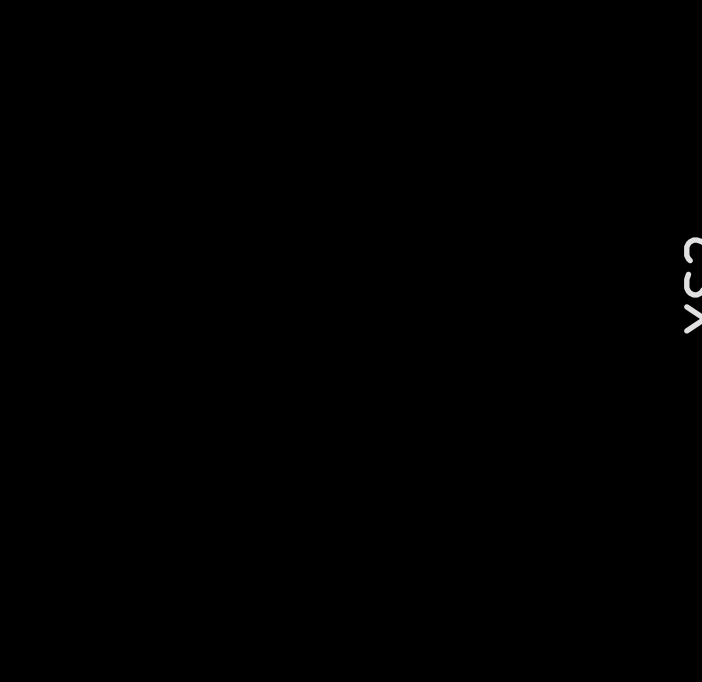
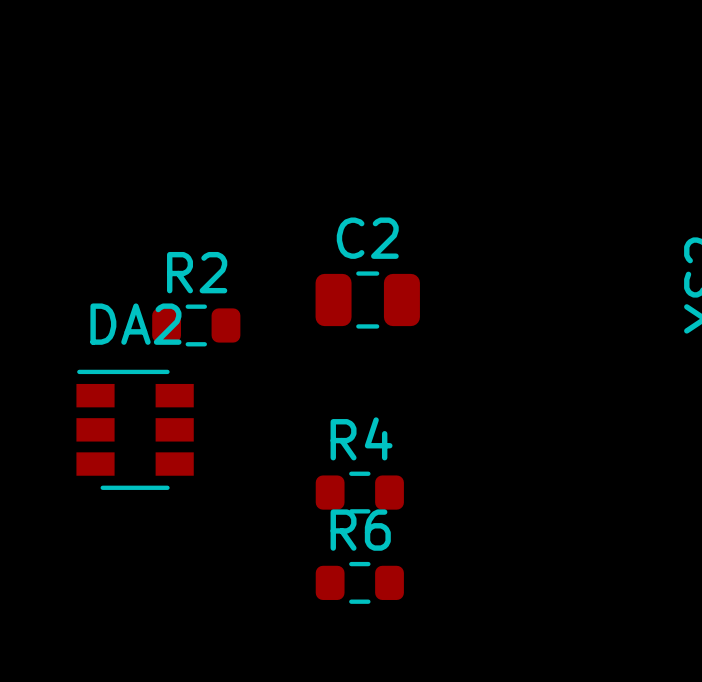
C2: none -> (367, 299)
R2: none -> (196, 325)
DA2: none -> (135, 429)
R4: none -> (359, 492)
R6: none -> (359, 582)

